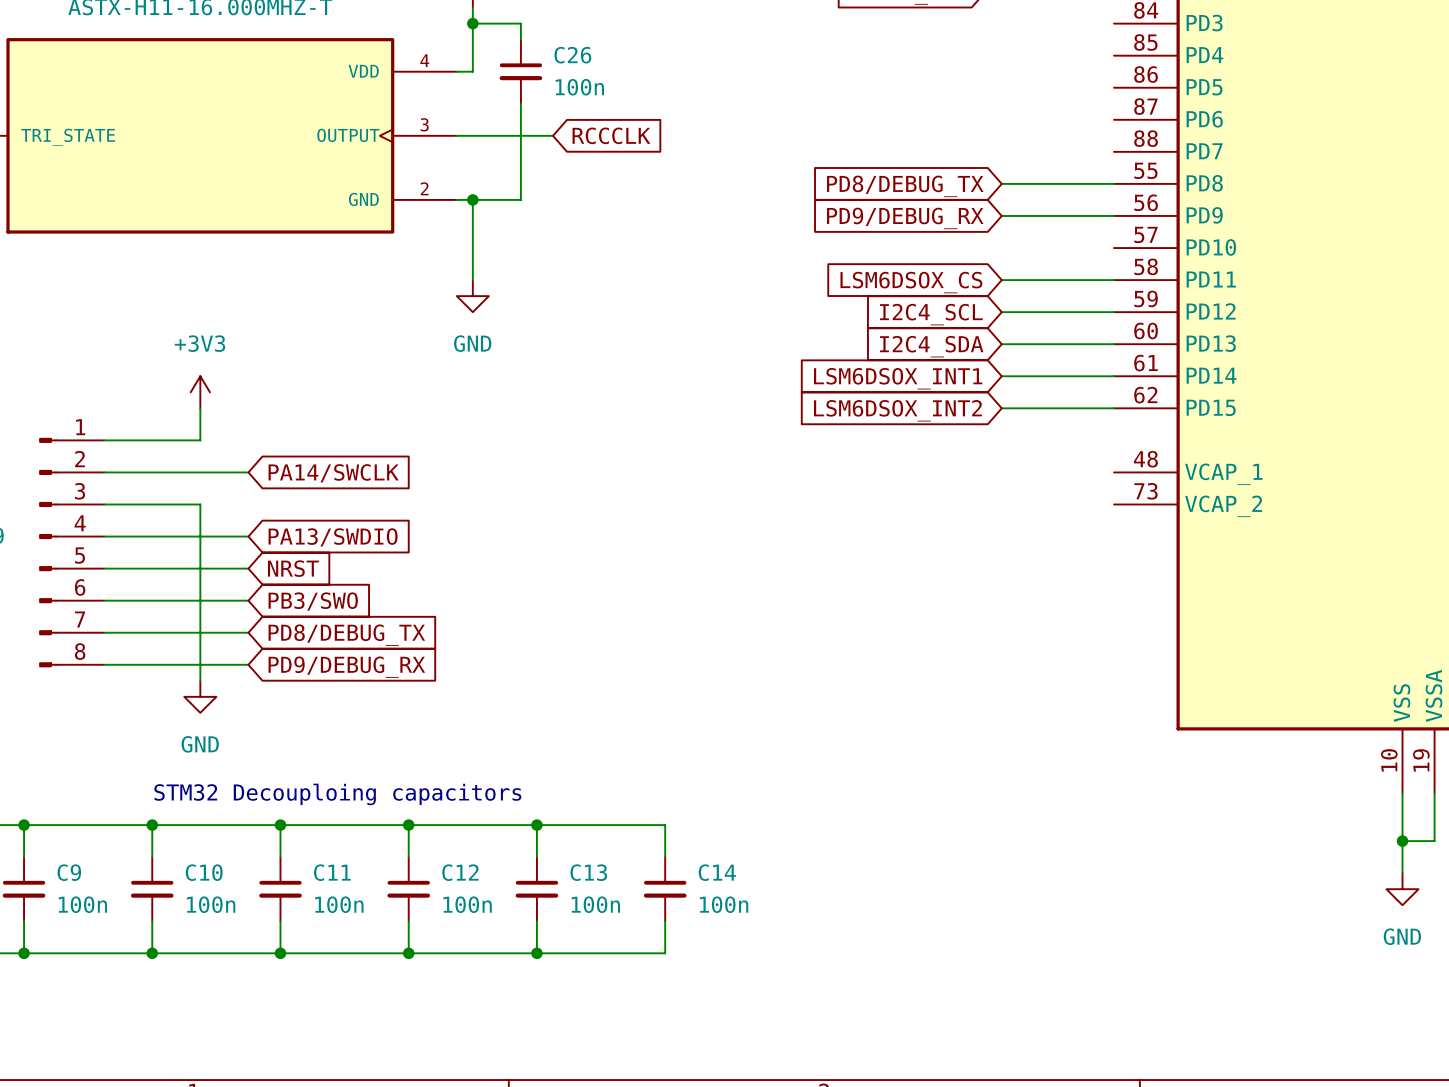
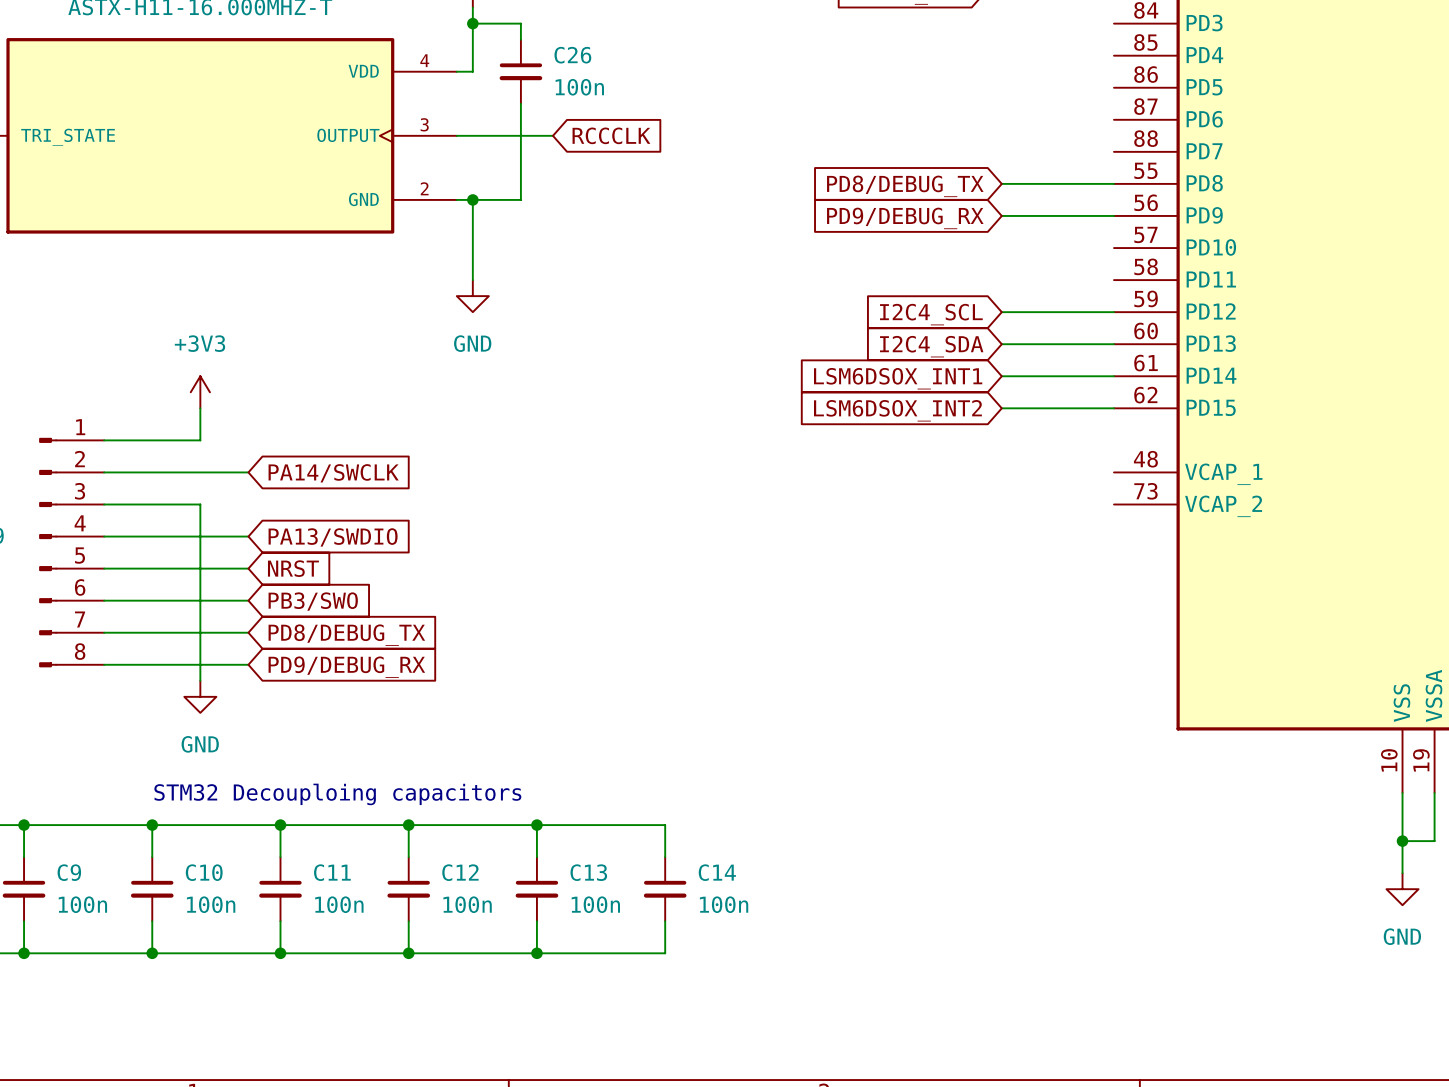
wire: (1001, 280) (1114, 280) -> none
global label: LSM6DSOX_CS (911, 282) -> none

